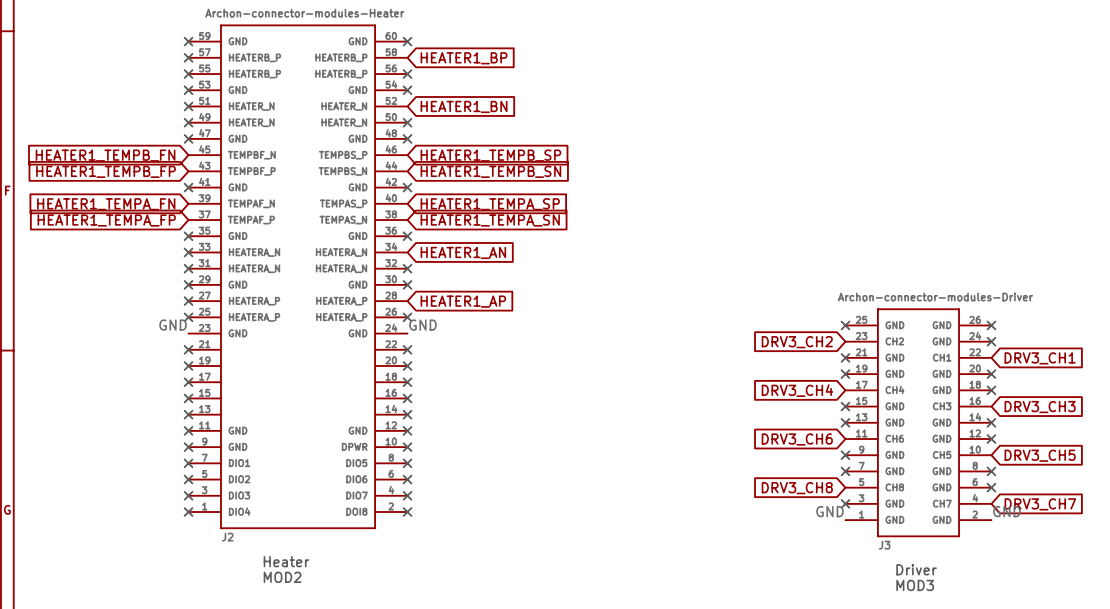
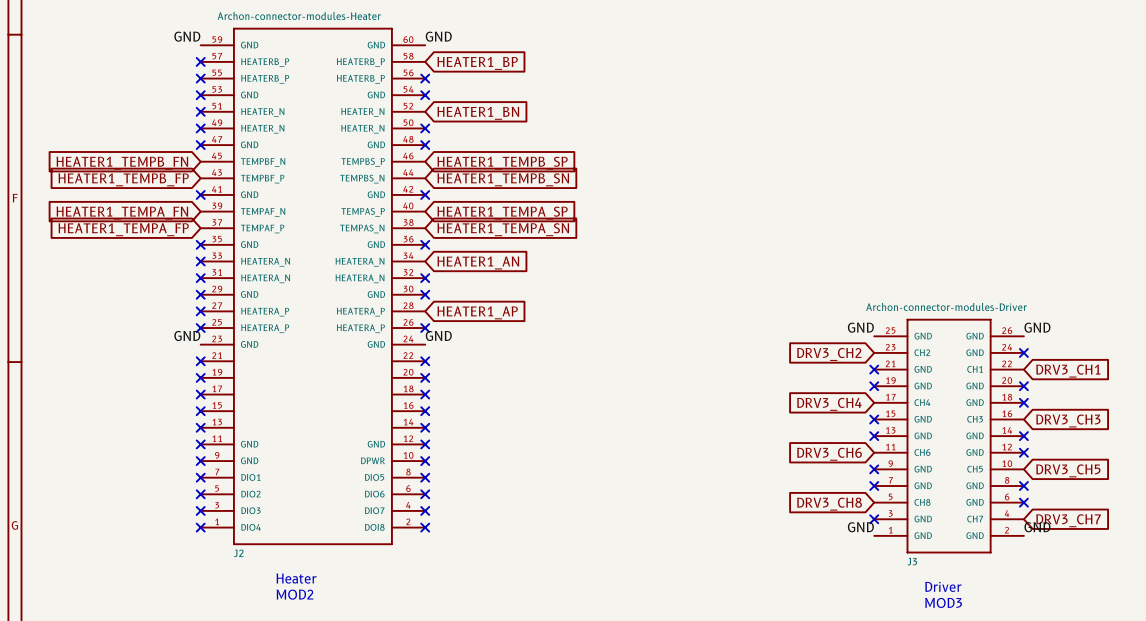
label: none -> GND (187, 36)
label: none -> GND (438, 36)
no-connect mark: (188, 41) -> none
no-connect mark: (407, 41) -> none
label: none -> GND (860, 327)
label: none -> GND (1037, 327)
no-connect mark: (845, 325) -> none
no-connect mark: (991, 325) -> none

